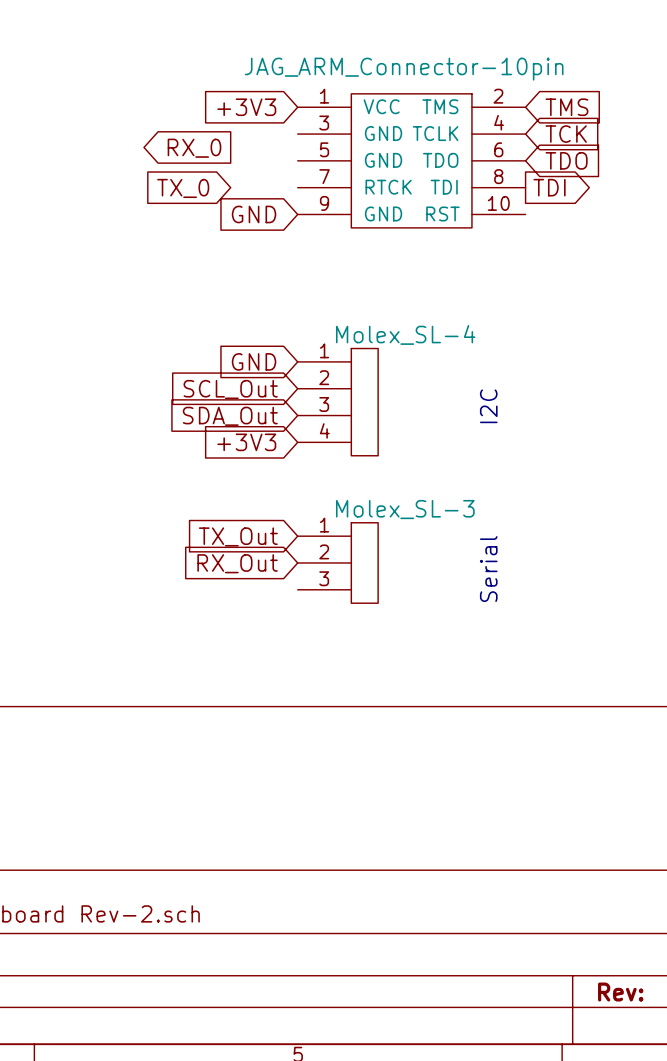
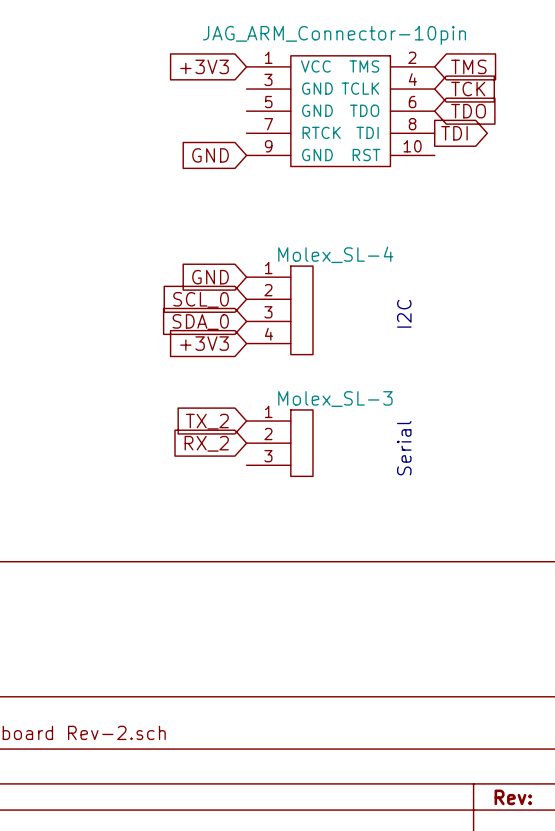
global label: RX_0 (194, 148) -> none
global label: TX_0 (183, 188) -> none
global label: SCL_Out (230, 389) -> SCL_0 (201, 299)
global label: SDA_Out (230, 416) -> SDA_0 (200, 322)
global label: TX_Out (238, 536) -> TX_2 (207, 421)
global label: RX_Out (237, 563) -> RX_2 (206, 443)

